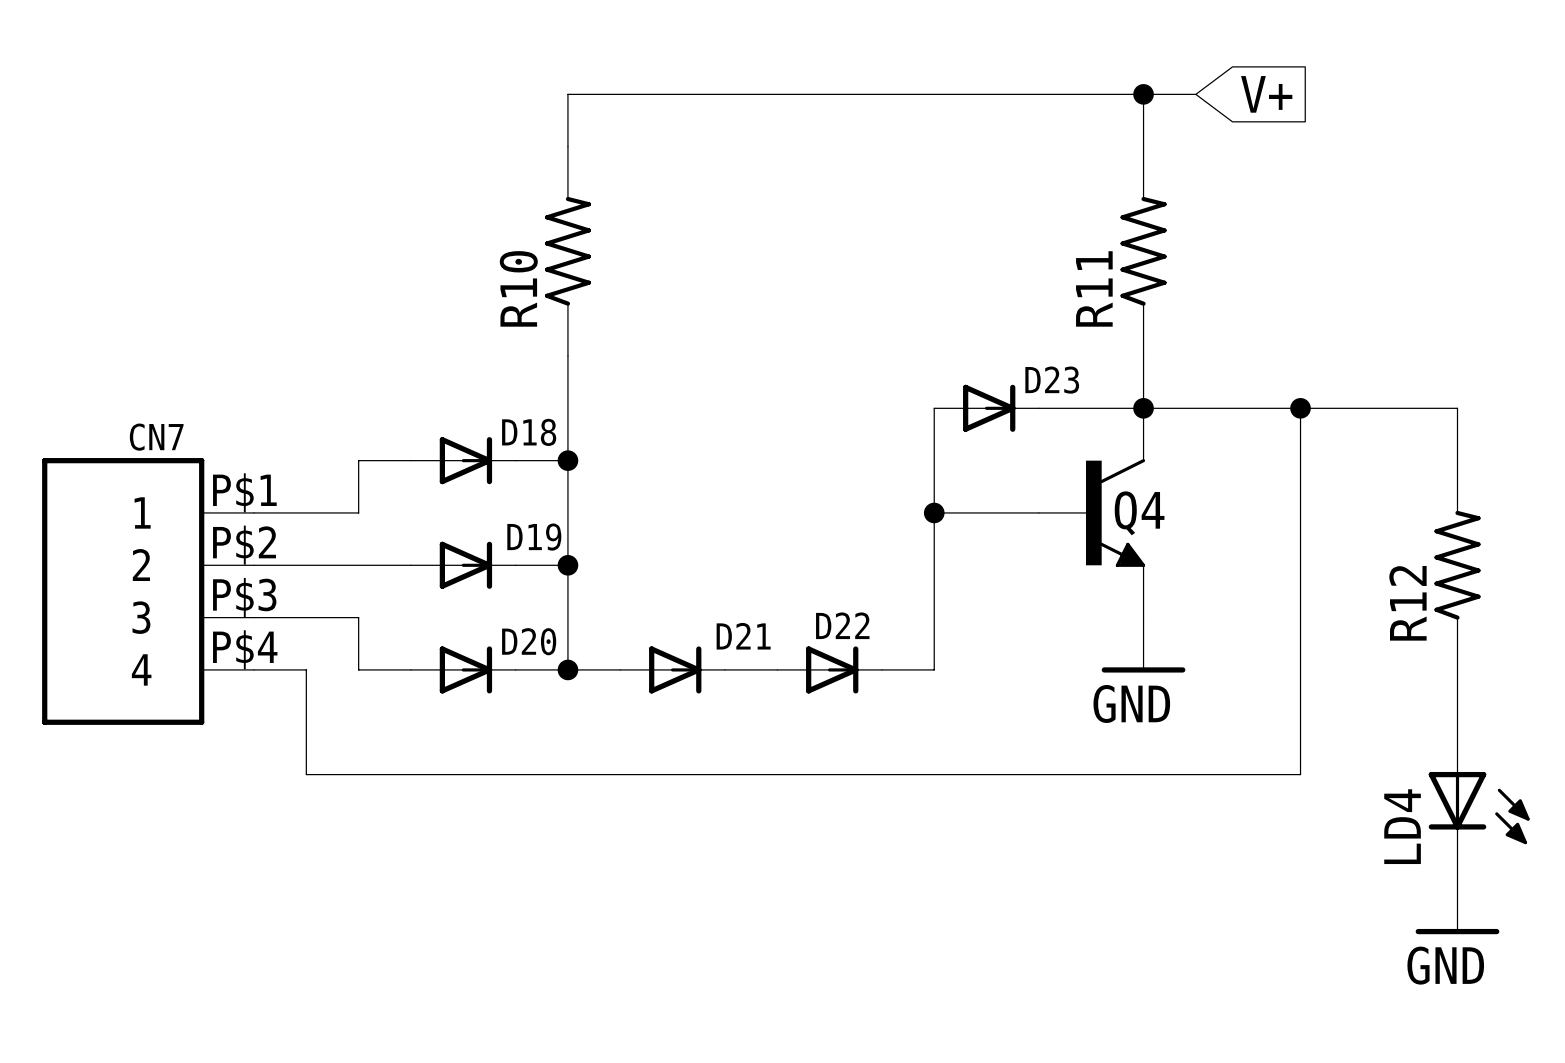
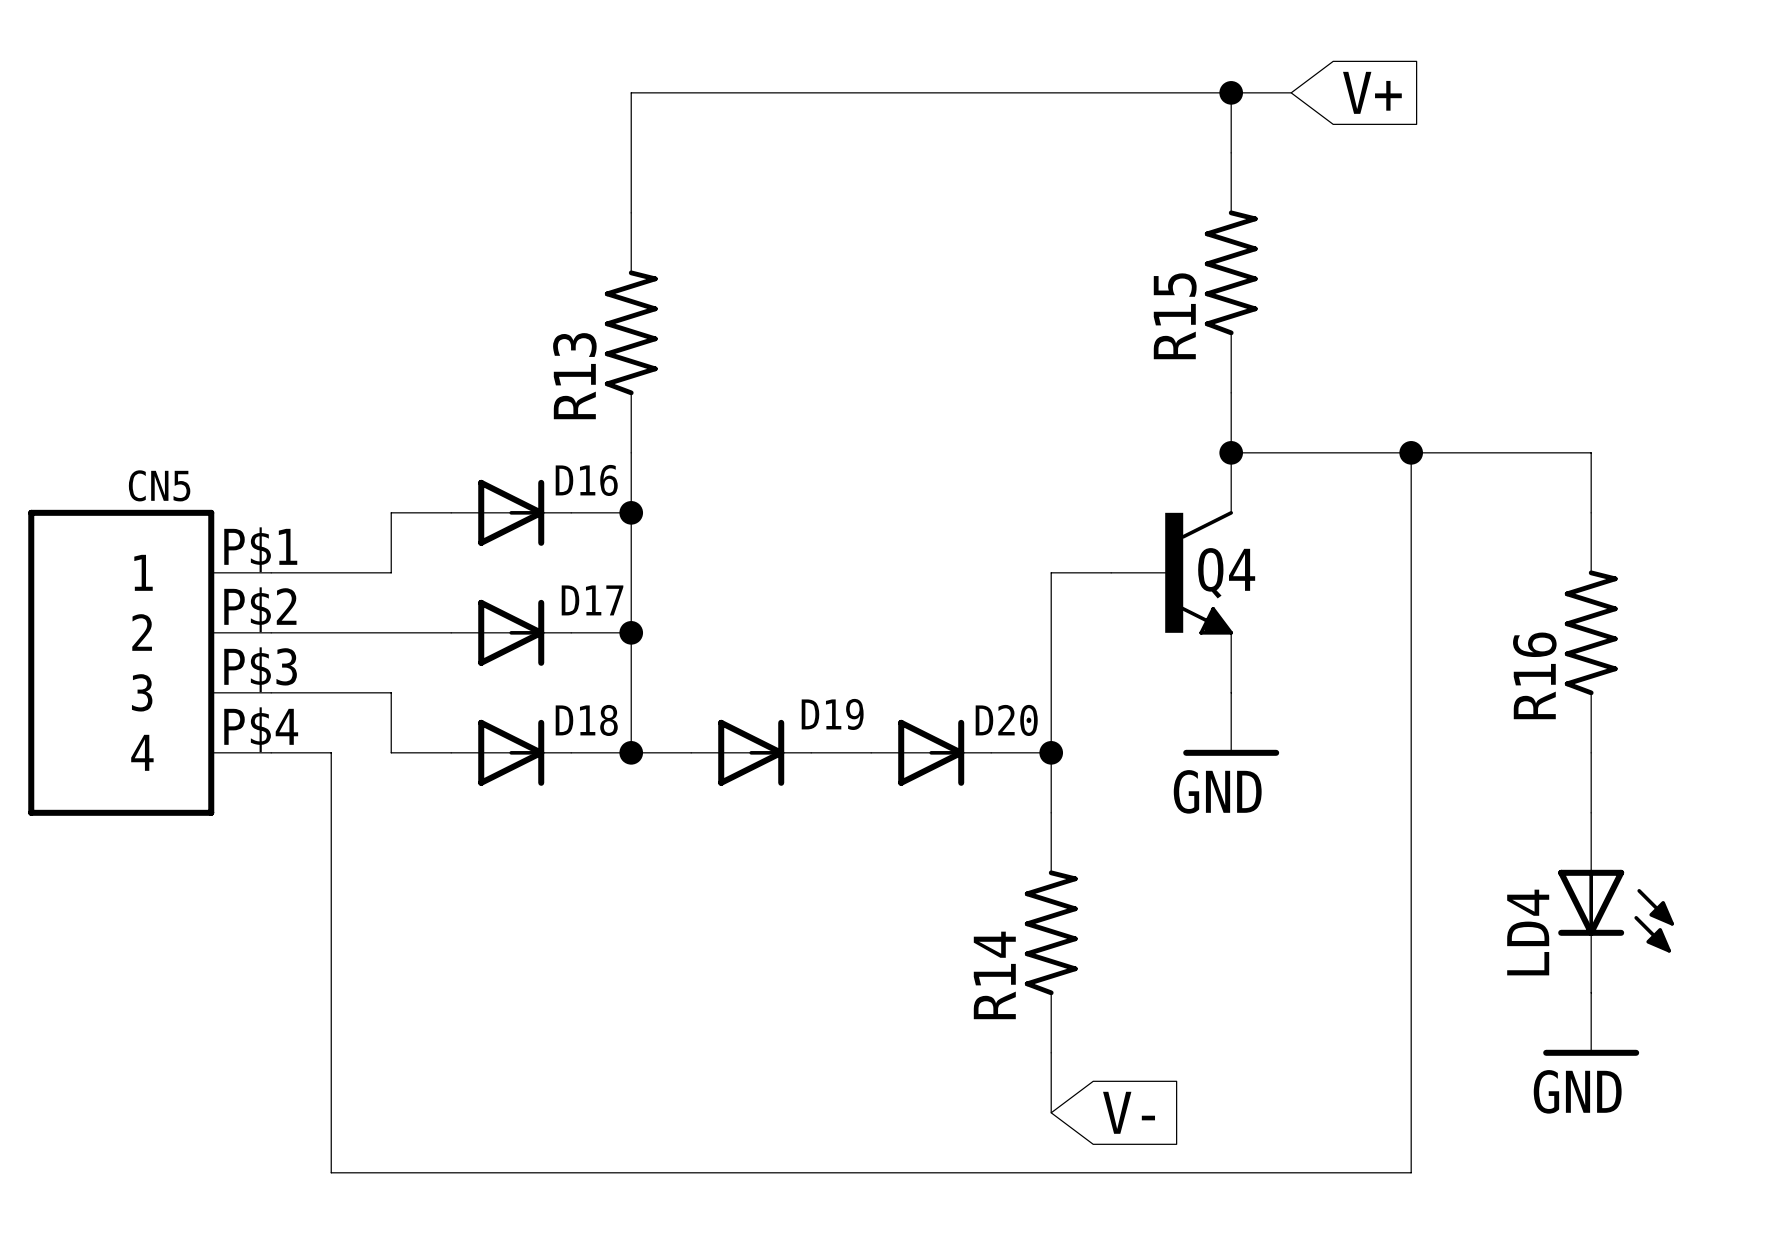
junction position: (1143, 94) -> (1231, 92)
wire: (1195, 94) (1143, 94) (1143, 146) -> none
global label position: V+ (1266, 94) -> V+ (1372, 92)
R10: (567, 251) -> none
R15: none -> (1231, 272)
R11: (1143, 251) -> none
R13: none -> (631, 332)
wire: (1143, 355) (1143, 408) -> (1231, 92) (1231, 152)
wire: (934, 408) (934, 512) -> none
D23: (986, 408) -> none
wire: (1038, 408) (1091, 408) -> (1231, 392) (1231, 452)
junction: none -> (1231, 452)
junction: (1143, 408) -> none
junction: none -> (1411, 452)
wire: (1300, 408) (1300, 774) (306, 774) -> (1411, 452) (1411, 1172) (331, 1172) (331, 872)
junction: (1300, 408) -> none
wire: (1405, 408) (1457, 408) (1457, 460) -> (1591, 452) (1591, 512)
CN7 name: CN7 (156, 437) -> CN5 (159, 485)
D18 symbol: [410, 437, 516, 485] -> [451, 719, 572, 786]
D16: none -> (511, 512)
junction: (934, 512) -> none
Q4 position: (1092, 512) -> (1172, 572)
D19 symbol: [410, 541, 516, 589] -> [691, 719, 812, 786]
D17: none -> (511, 632)
R16: none -> (1591, 632)
R12: (1457, 565) -> none
power symbol position: GND (1143, 645) -> GND (1231, 724)
D20 symbol: [410, 646, 516, 694] -> [871, 719, 992, 786]
D21: (672, 669) -> none
D22: (829, 669) -> none
wire: none -> (1051, 752) (1051, 812)
junction: none -> (1051, 752)
wire: (1457, 669) (1457, 722) -> (1591, 752) (1591, 812)
LD4 position: (1479, 800) -> (1616, 902)
R14: none -> (1051, 932)
power symbol position: GND (1457, 906) -> GND (1591, 1024)
wire: none -> (1051, 1052) (1051, 1112)
global label: none -> V- (1129, 1112)

